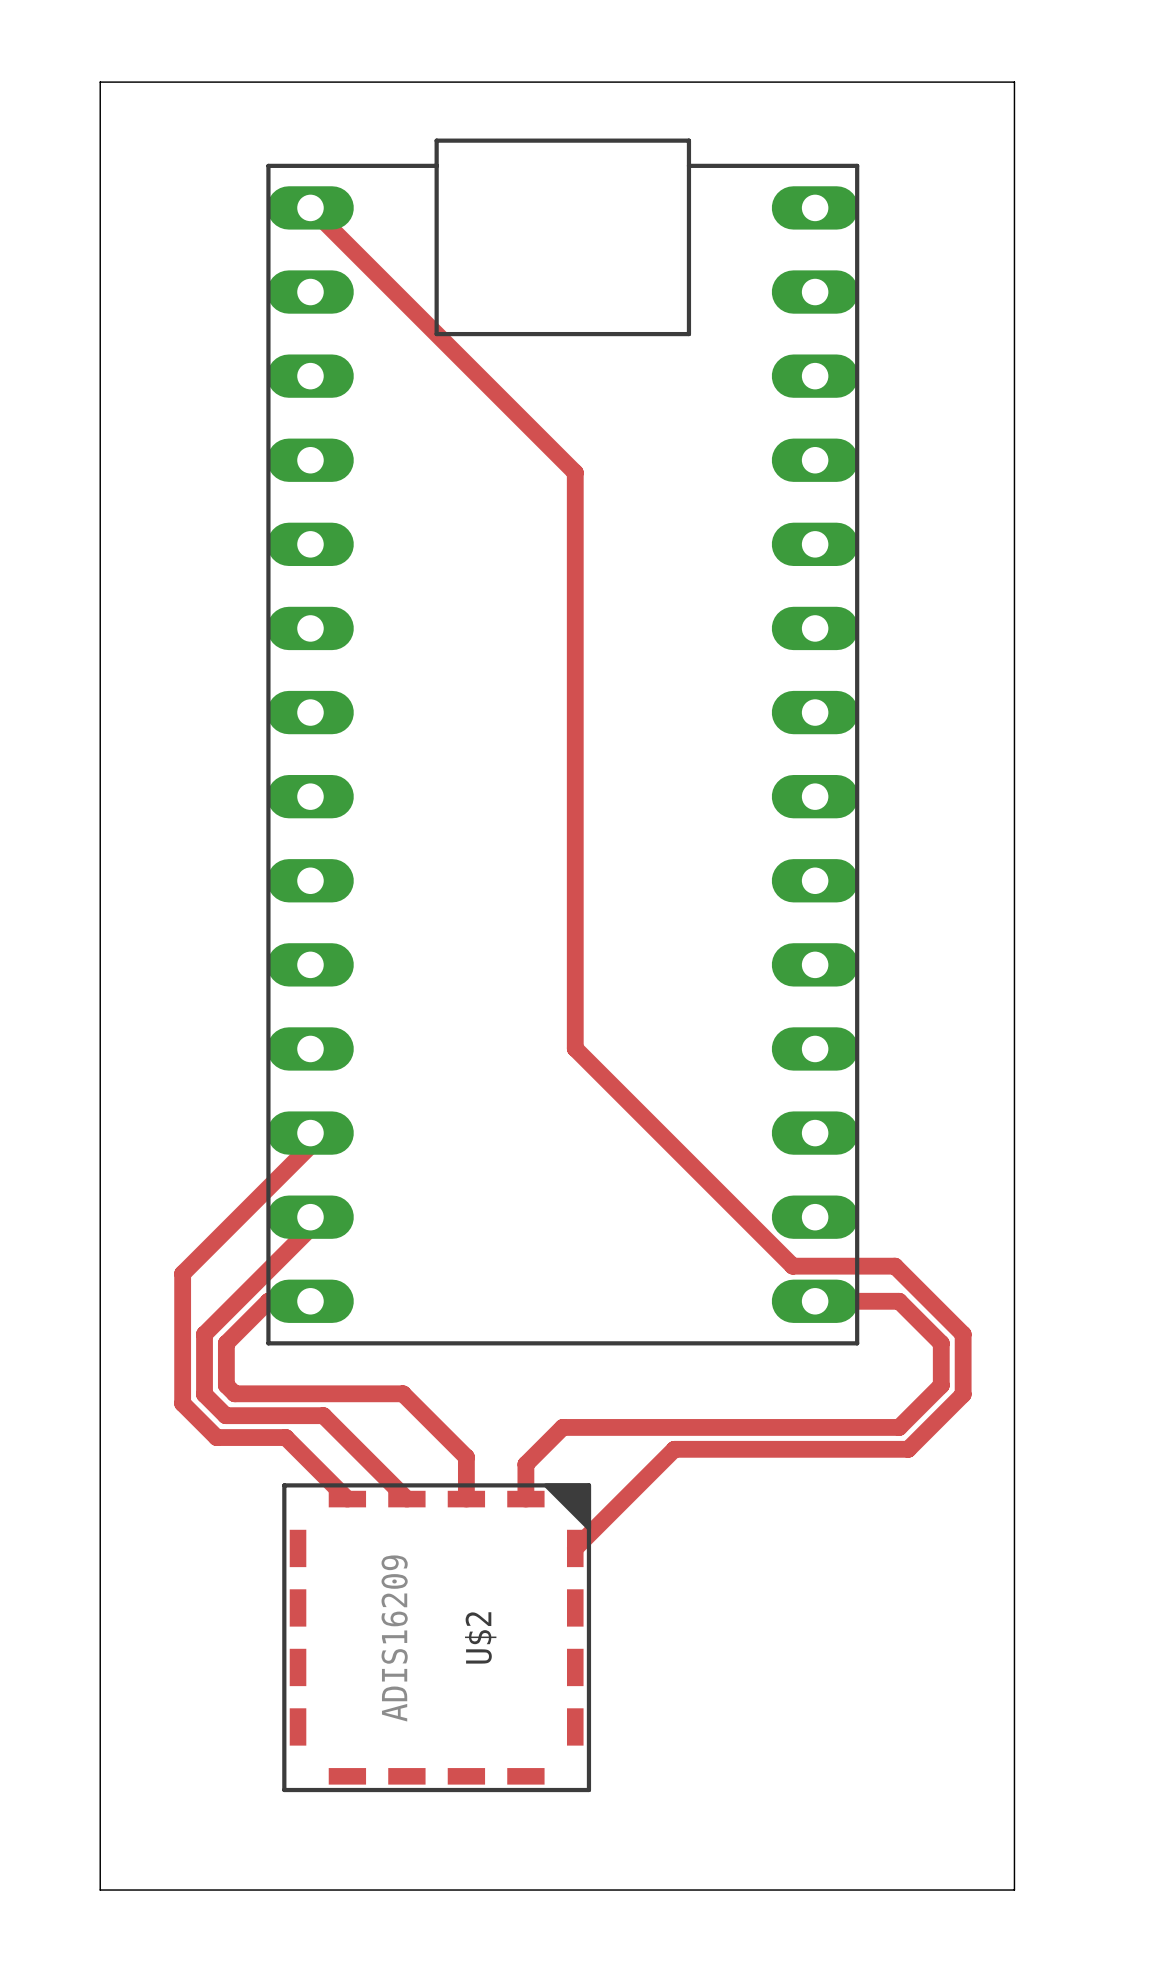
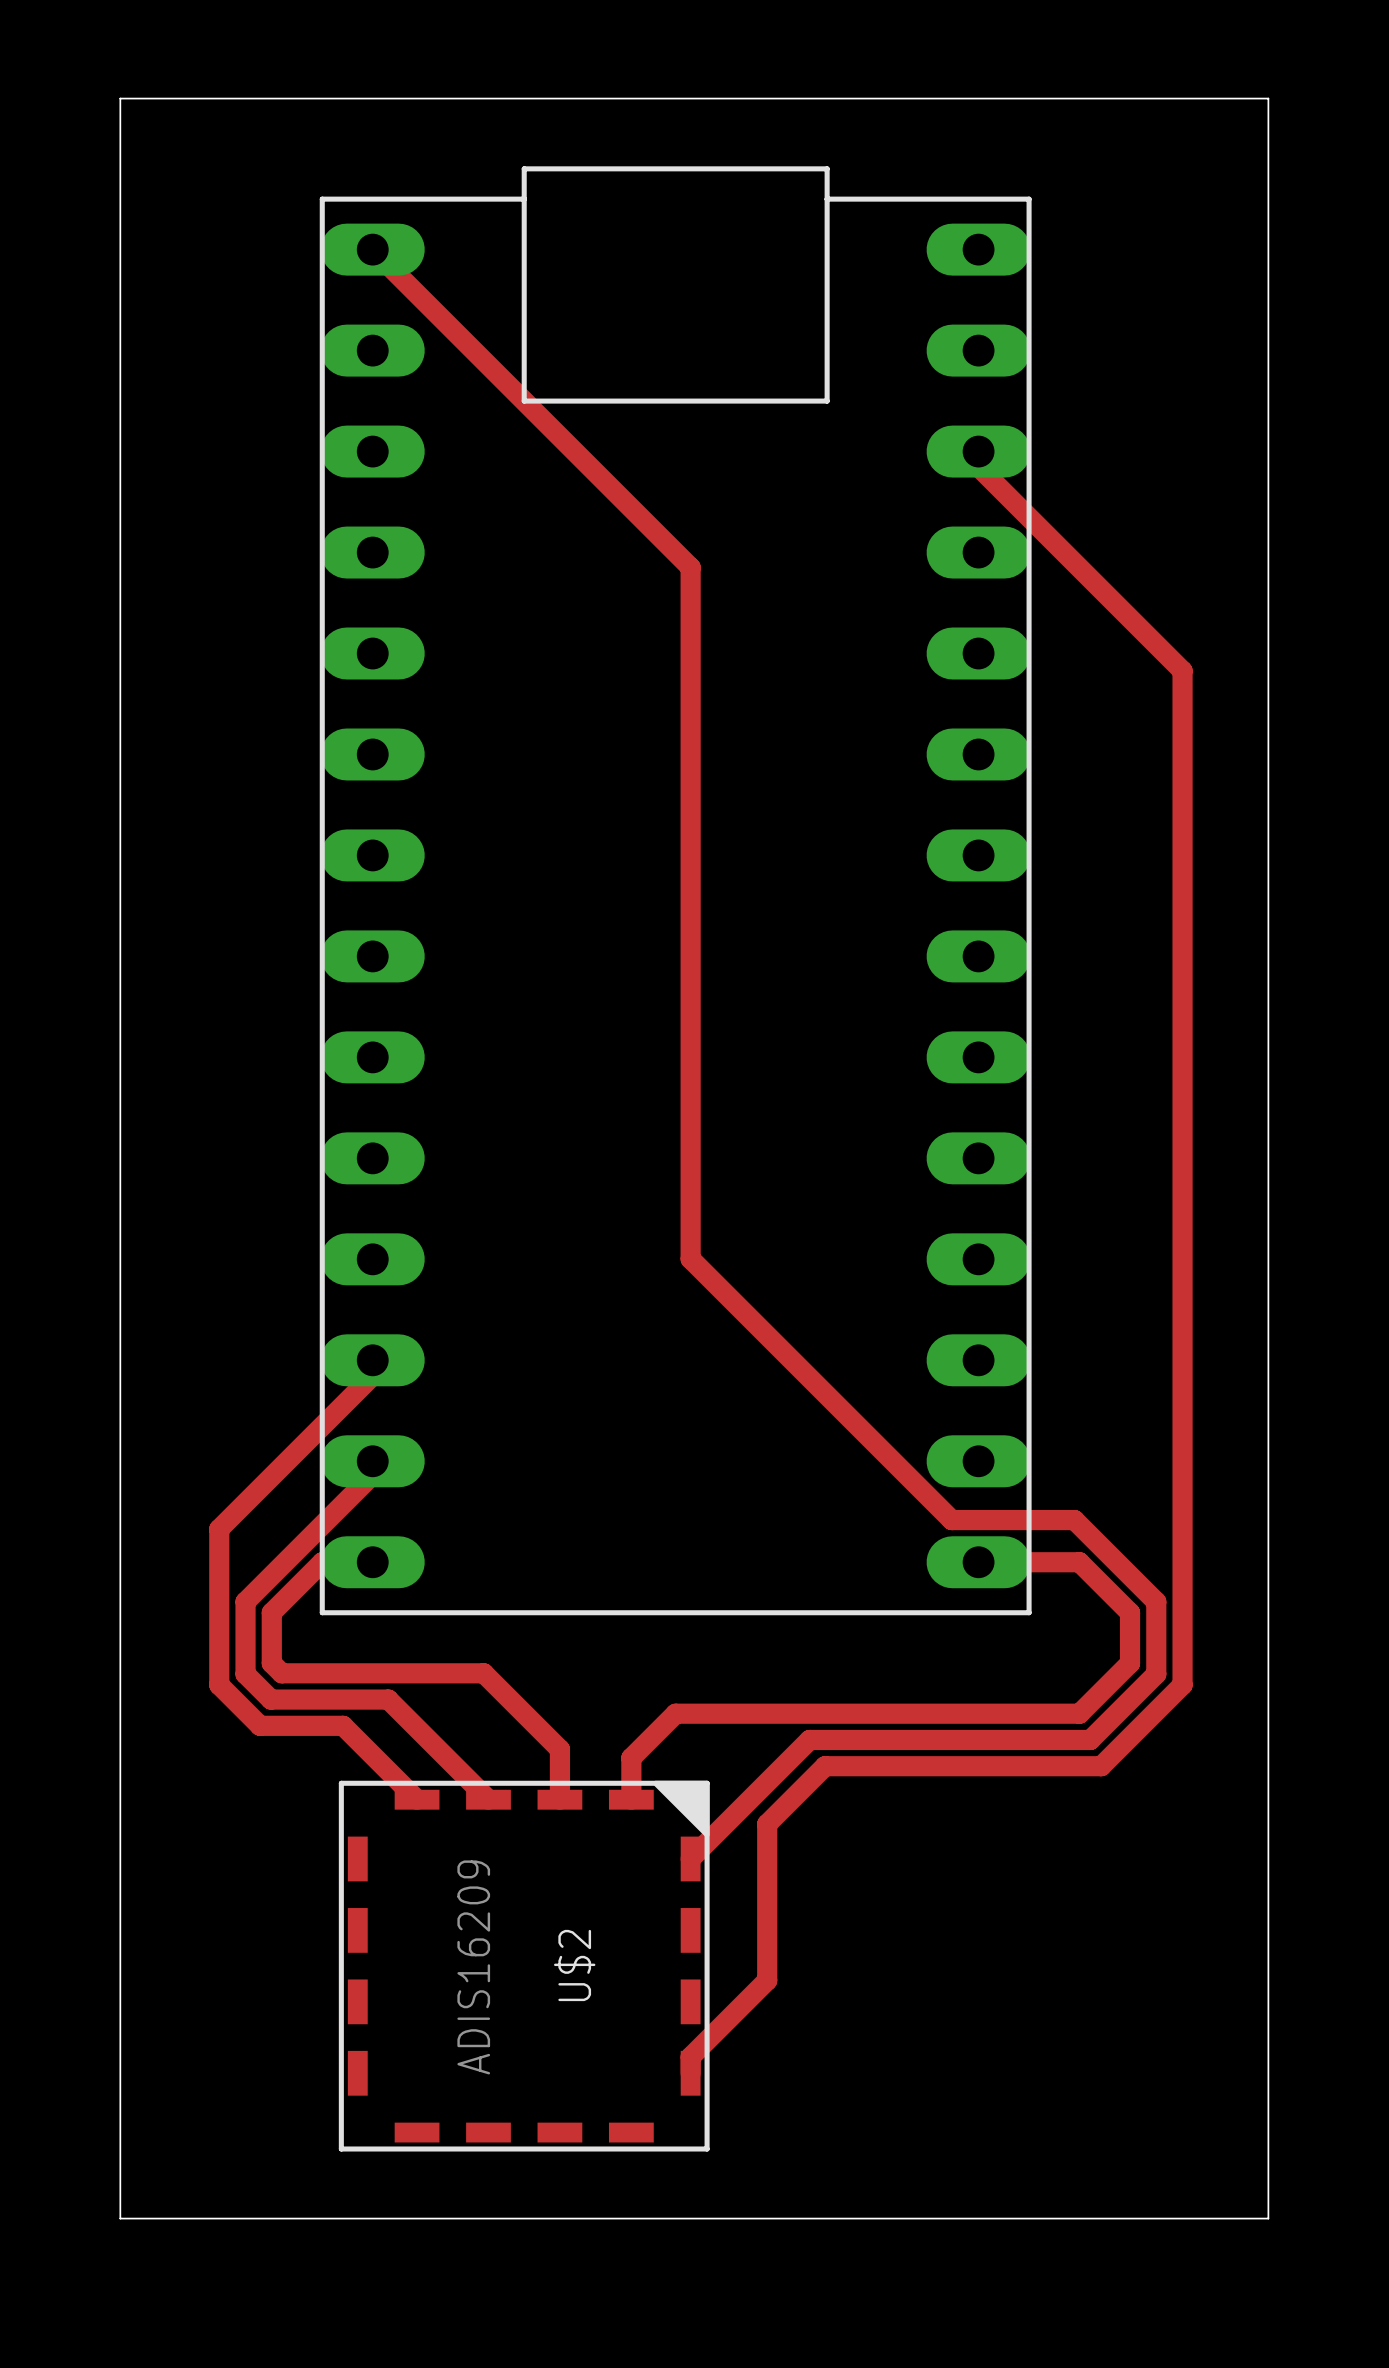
board edge: (1014, 82) (1014, 1890) (100, 1890) (100, 1847) -> (1217, 98) (1268, 98) (1268, 2218) (120, 2218)
track: none -> (978, 451) (978, 466) (1182, 670) (1182, 1684) (1101, 1766) (825, 1766) (767, 1824) (767, 1980) (690, 2057) (690, 2073)

